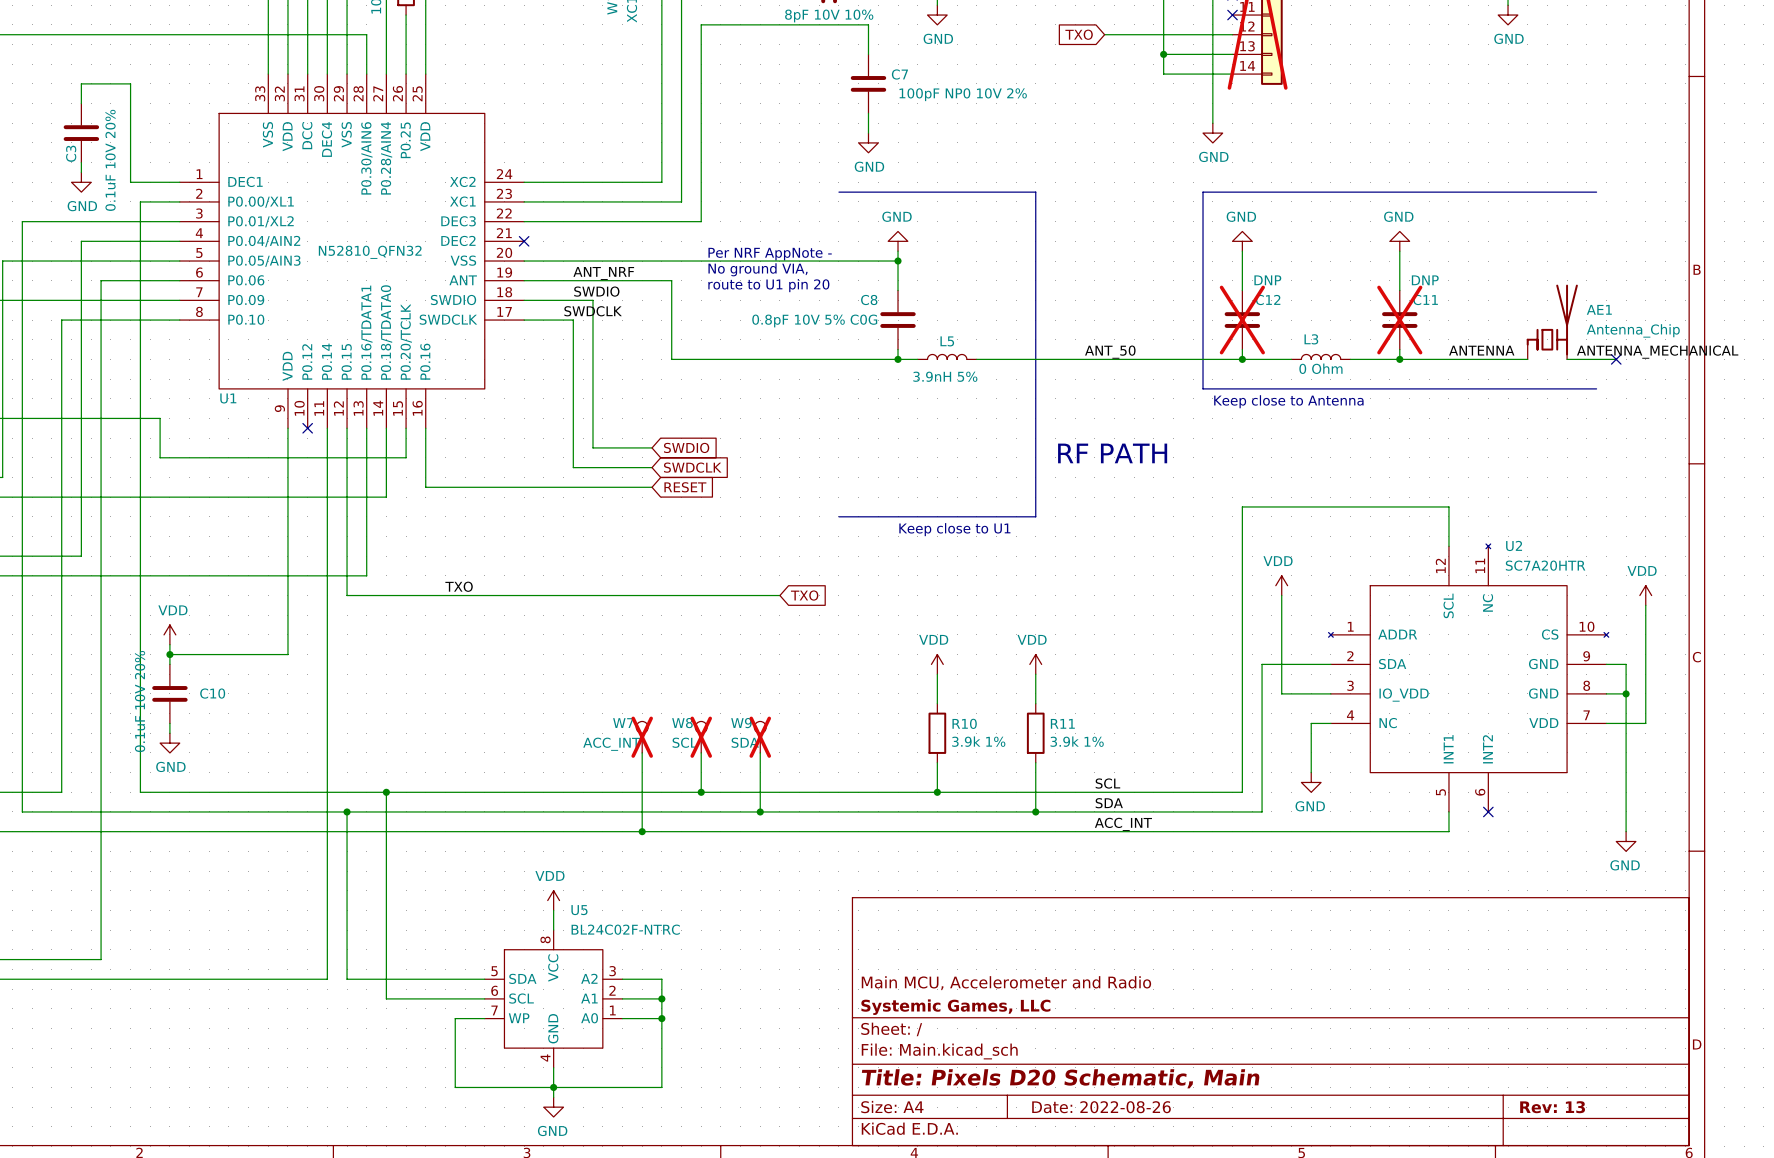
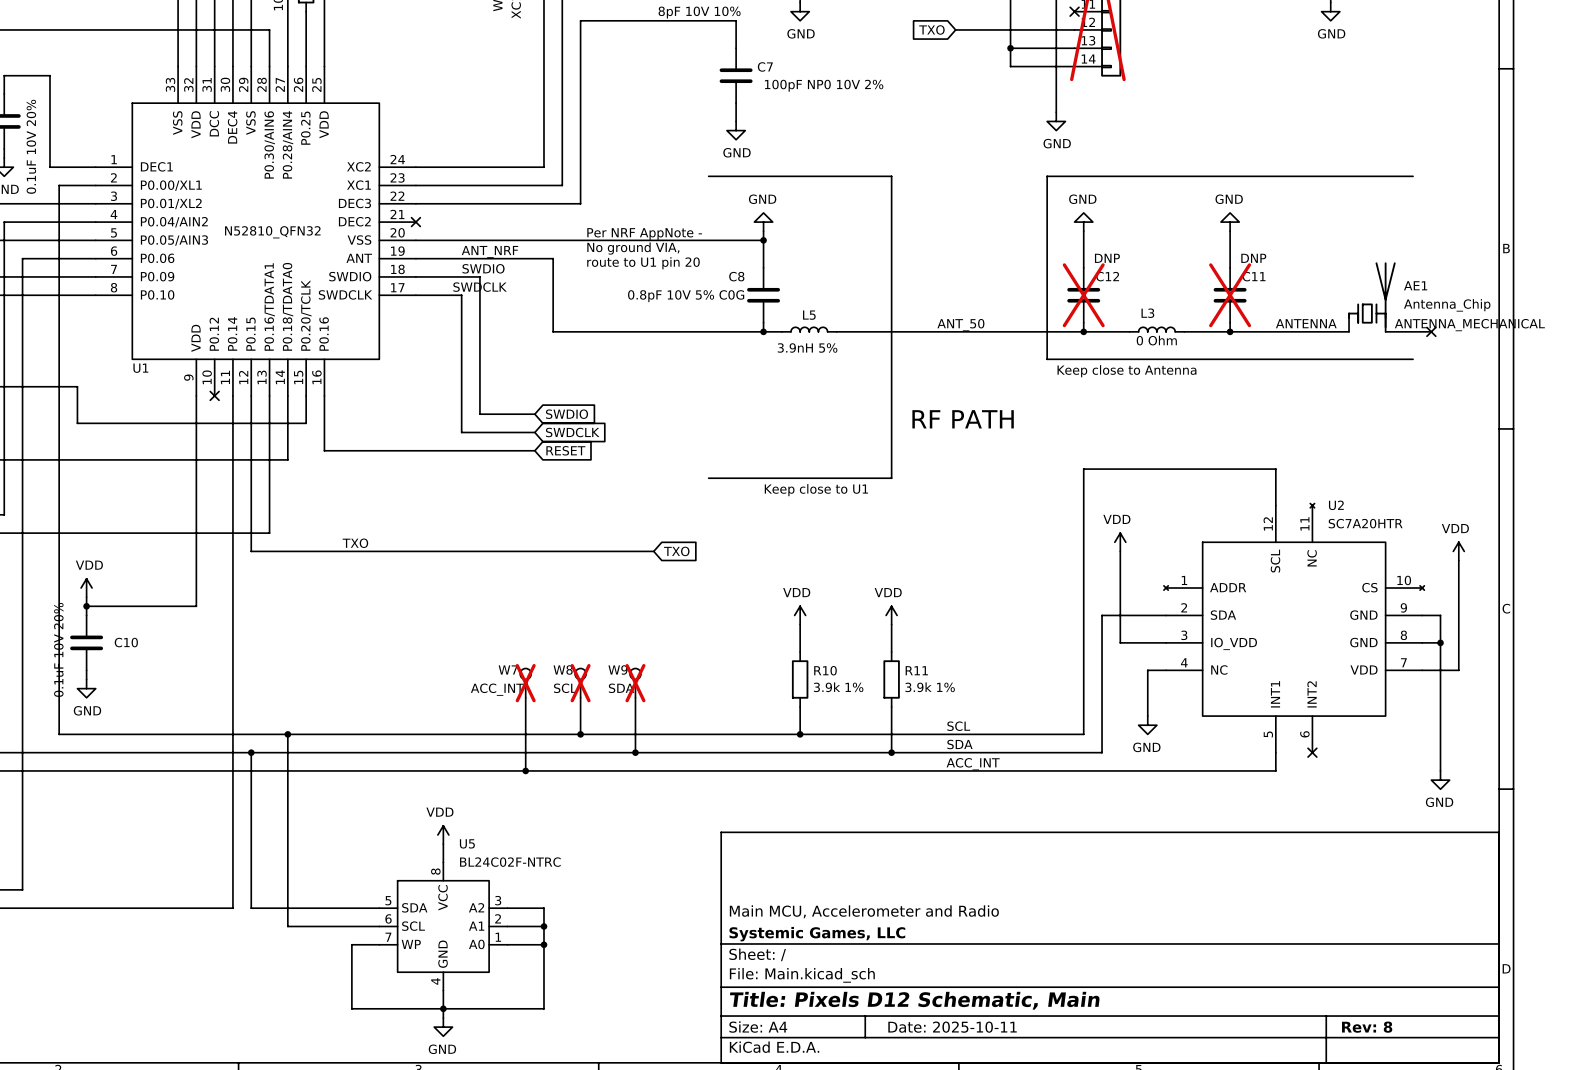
title block: Title: Pixels D20 Schematic, Main (1060, 1078) -> Title: Pixels D12 Schematic, Main (914, 1000)
title block: Date: 2022-08-26 (1101, 1107) -> Date: 2025-10-11 (952, 1027)
title block: Rev: 13 (1552, 1107) -> Rev: 8 (1367, 1027)

